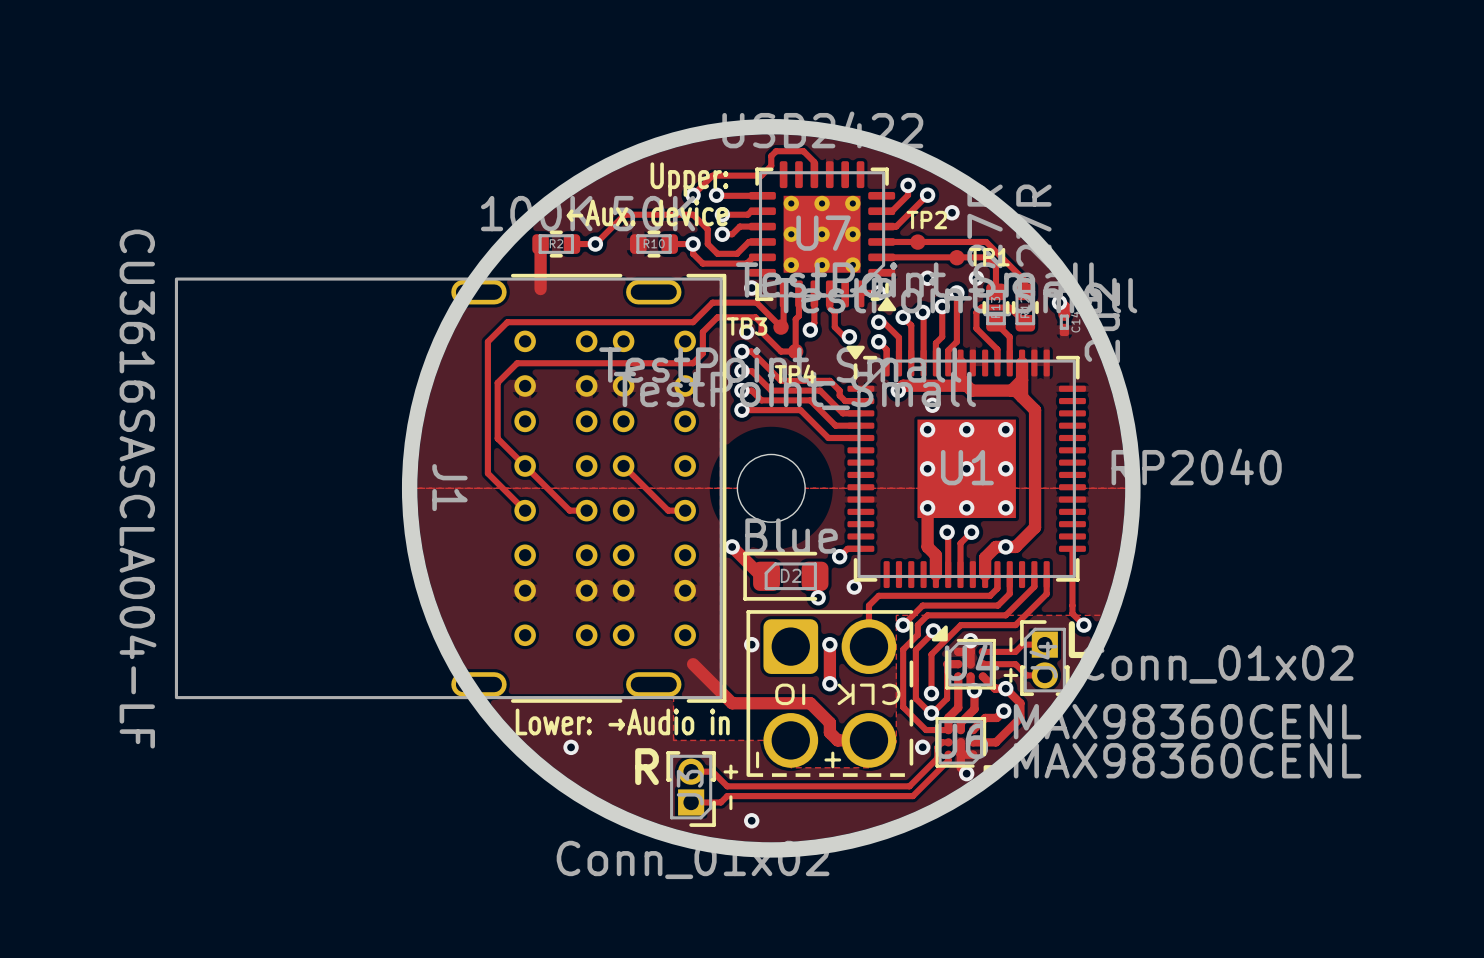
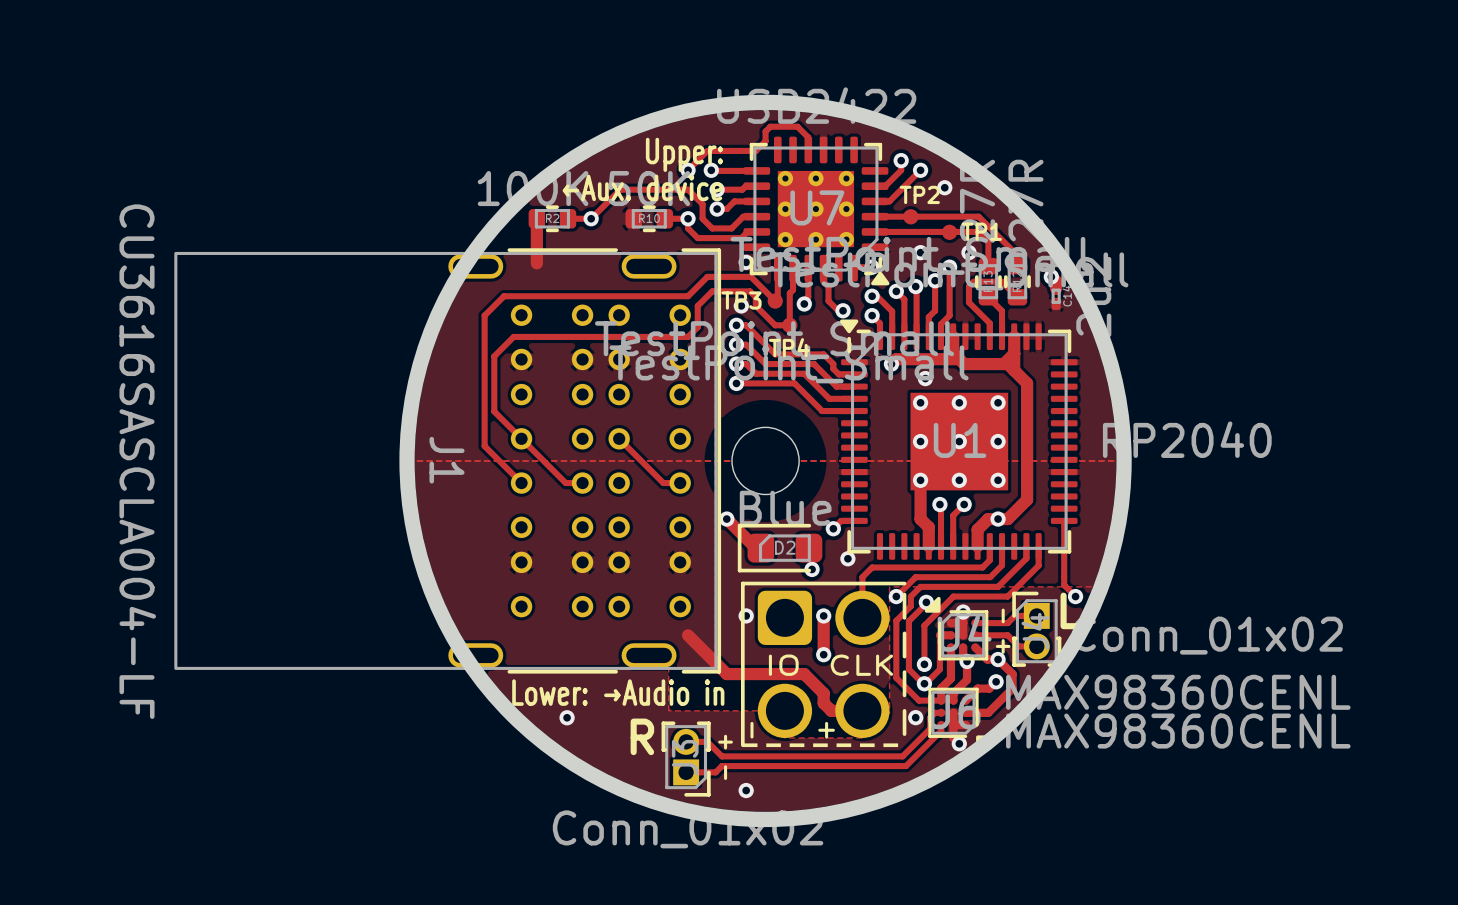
part footprint: [746, 610, 914, 777] -> [740, 581, 907, 748]

